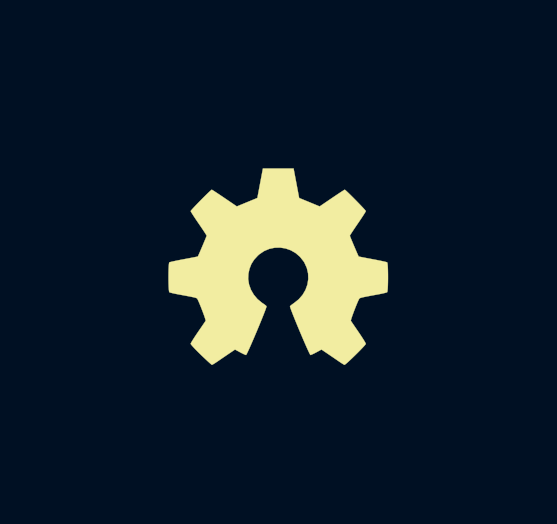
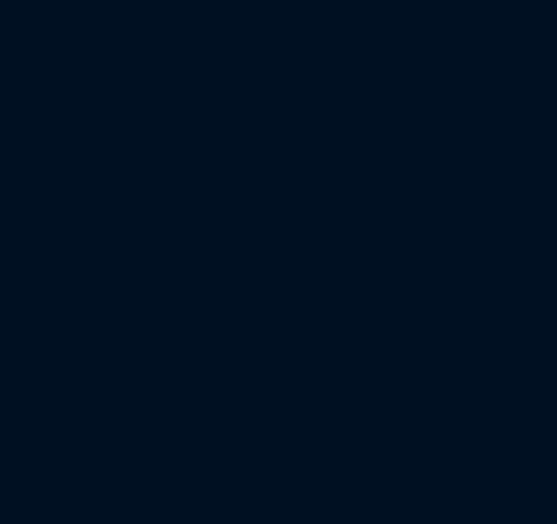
drawing: [168, 168, 389, 366] -> none

